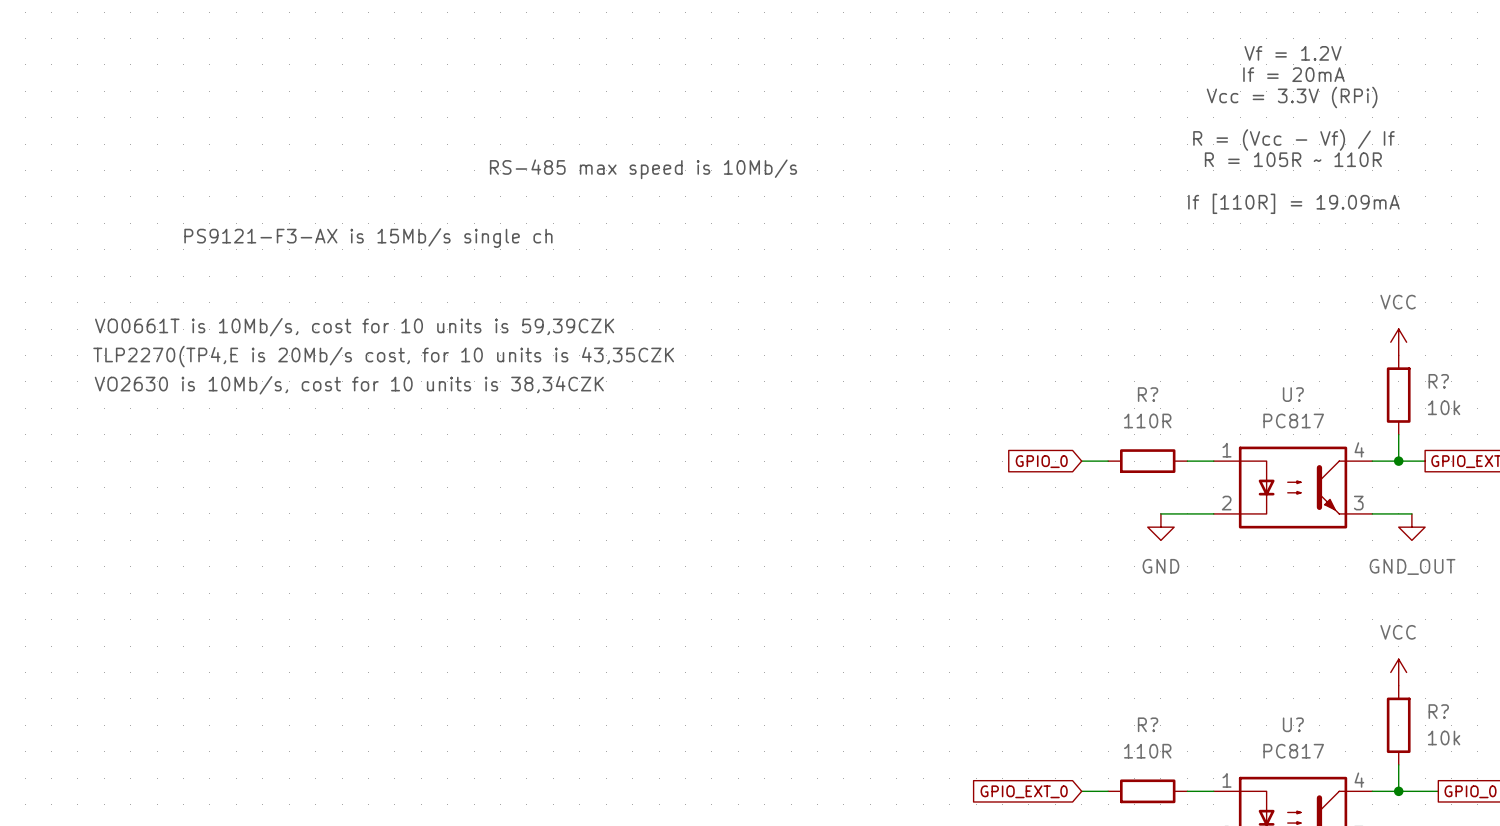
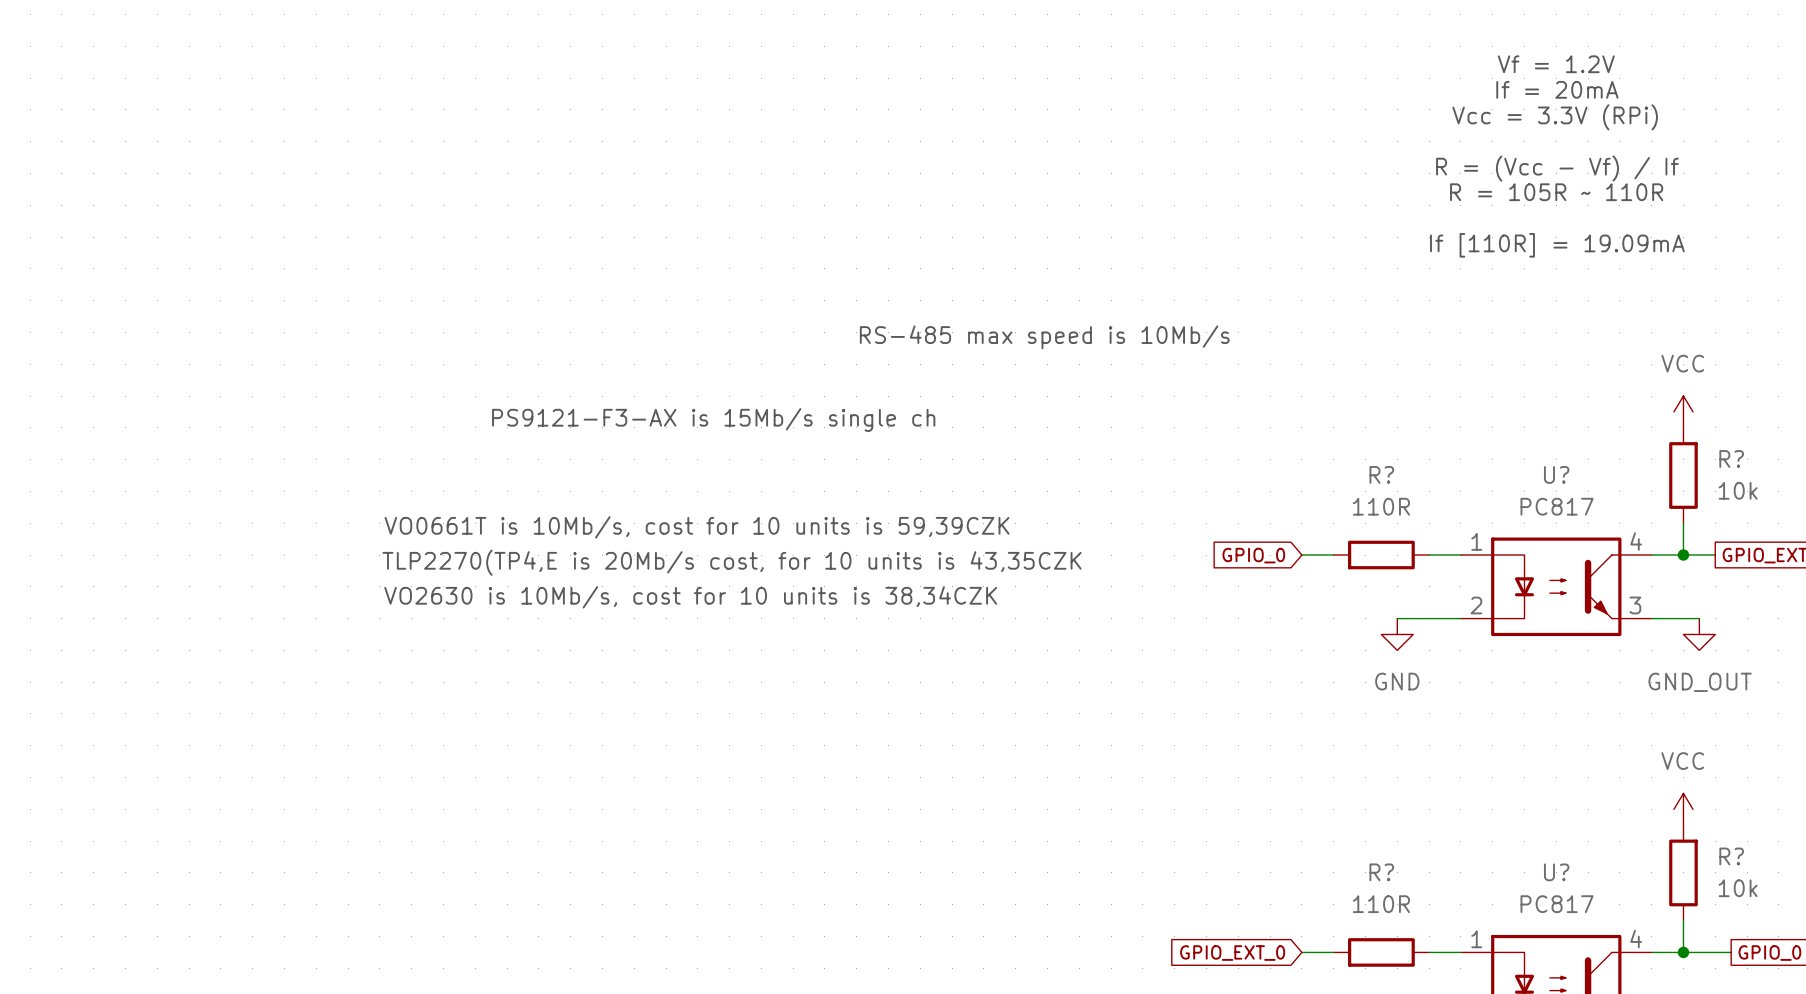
text position: RS-485 max speed is 10Mb/s (643, 169) -> RS-485 max speed is 10Mb/s (1044, 337)
text position: PS9121-F3-AX is 15Mb/s single ch (368, 238) -> PS9121-F3-AX is 15Mb/s single ch (713, 420)
text position: VO0661T is 10Mb/s, cost for 10 units is 59,39CZK (354, 327) -> VO0661T is 10Mb/s, cost for 10 units is 59,39CZK (697, 527)
text position: TLP2270(TP4,E is 20Mb/s cost, for 10 units is 43,35CZK (383, 356) -> TLP2270(TP4,E is 20Mb/s cost, for 10 units is 43,35CZK (732, 562)
text position: VO2630 is 10Mb/s, cost for 10 units is 38,34CZK (349, 385) -> VO2630 is 10Mb/s, cost for 10 units is 38,34CZK (690, 597)

